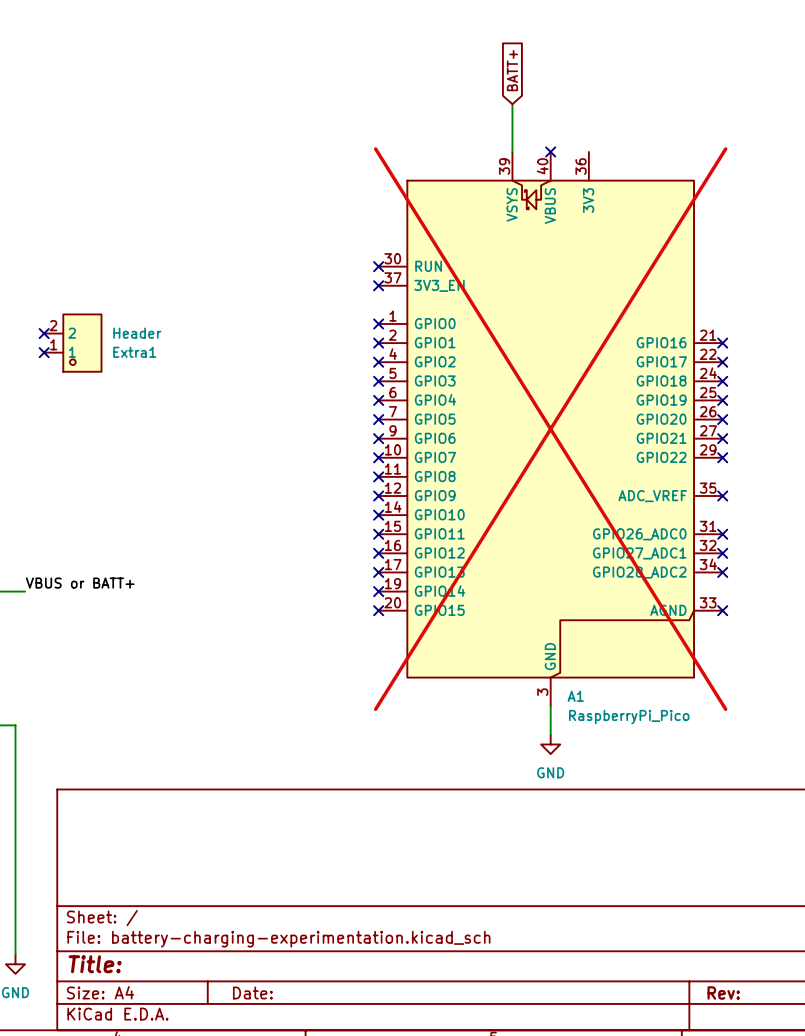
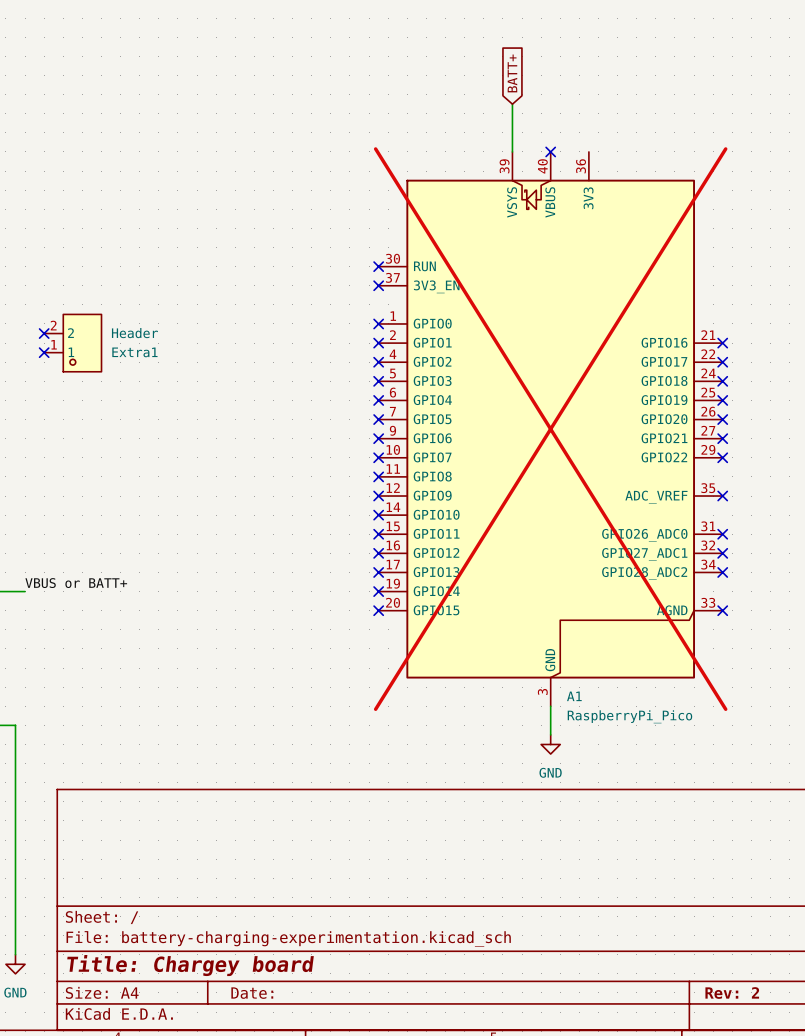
title block: Title: (95, 964) -> Title: Chargey board (190, 965)
title block: Rev: (723, 992) -> Rev: 2 (732, 993)

